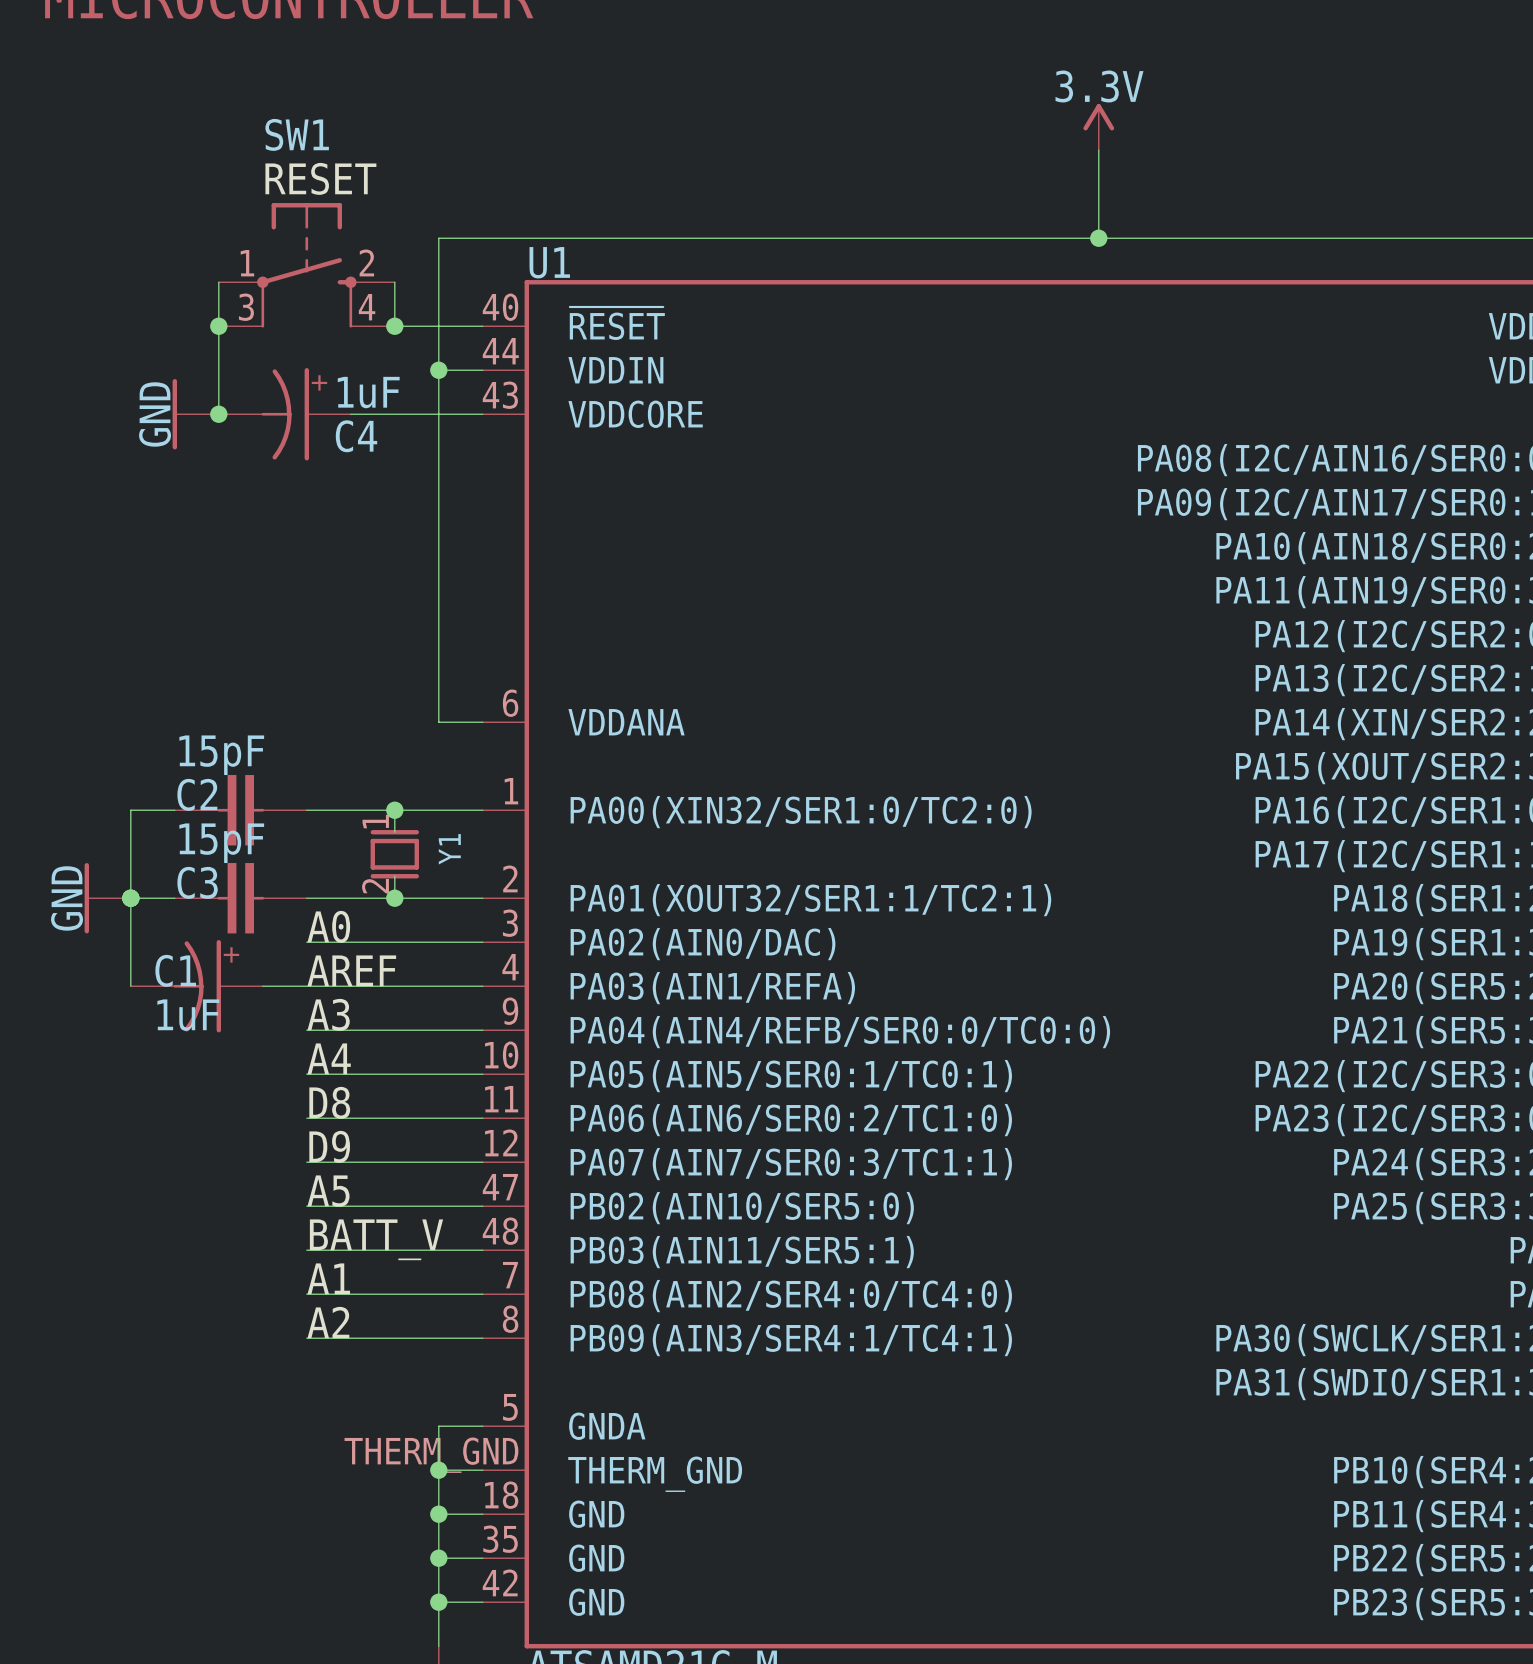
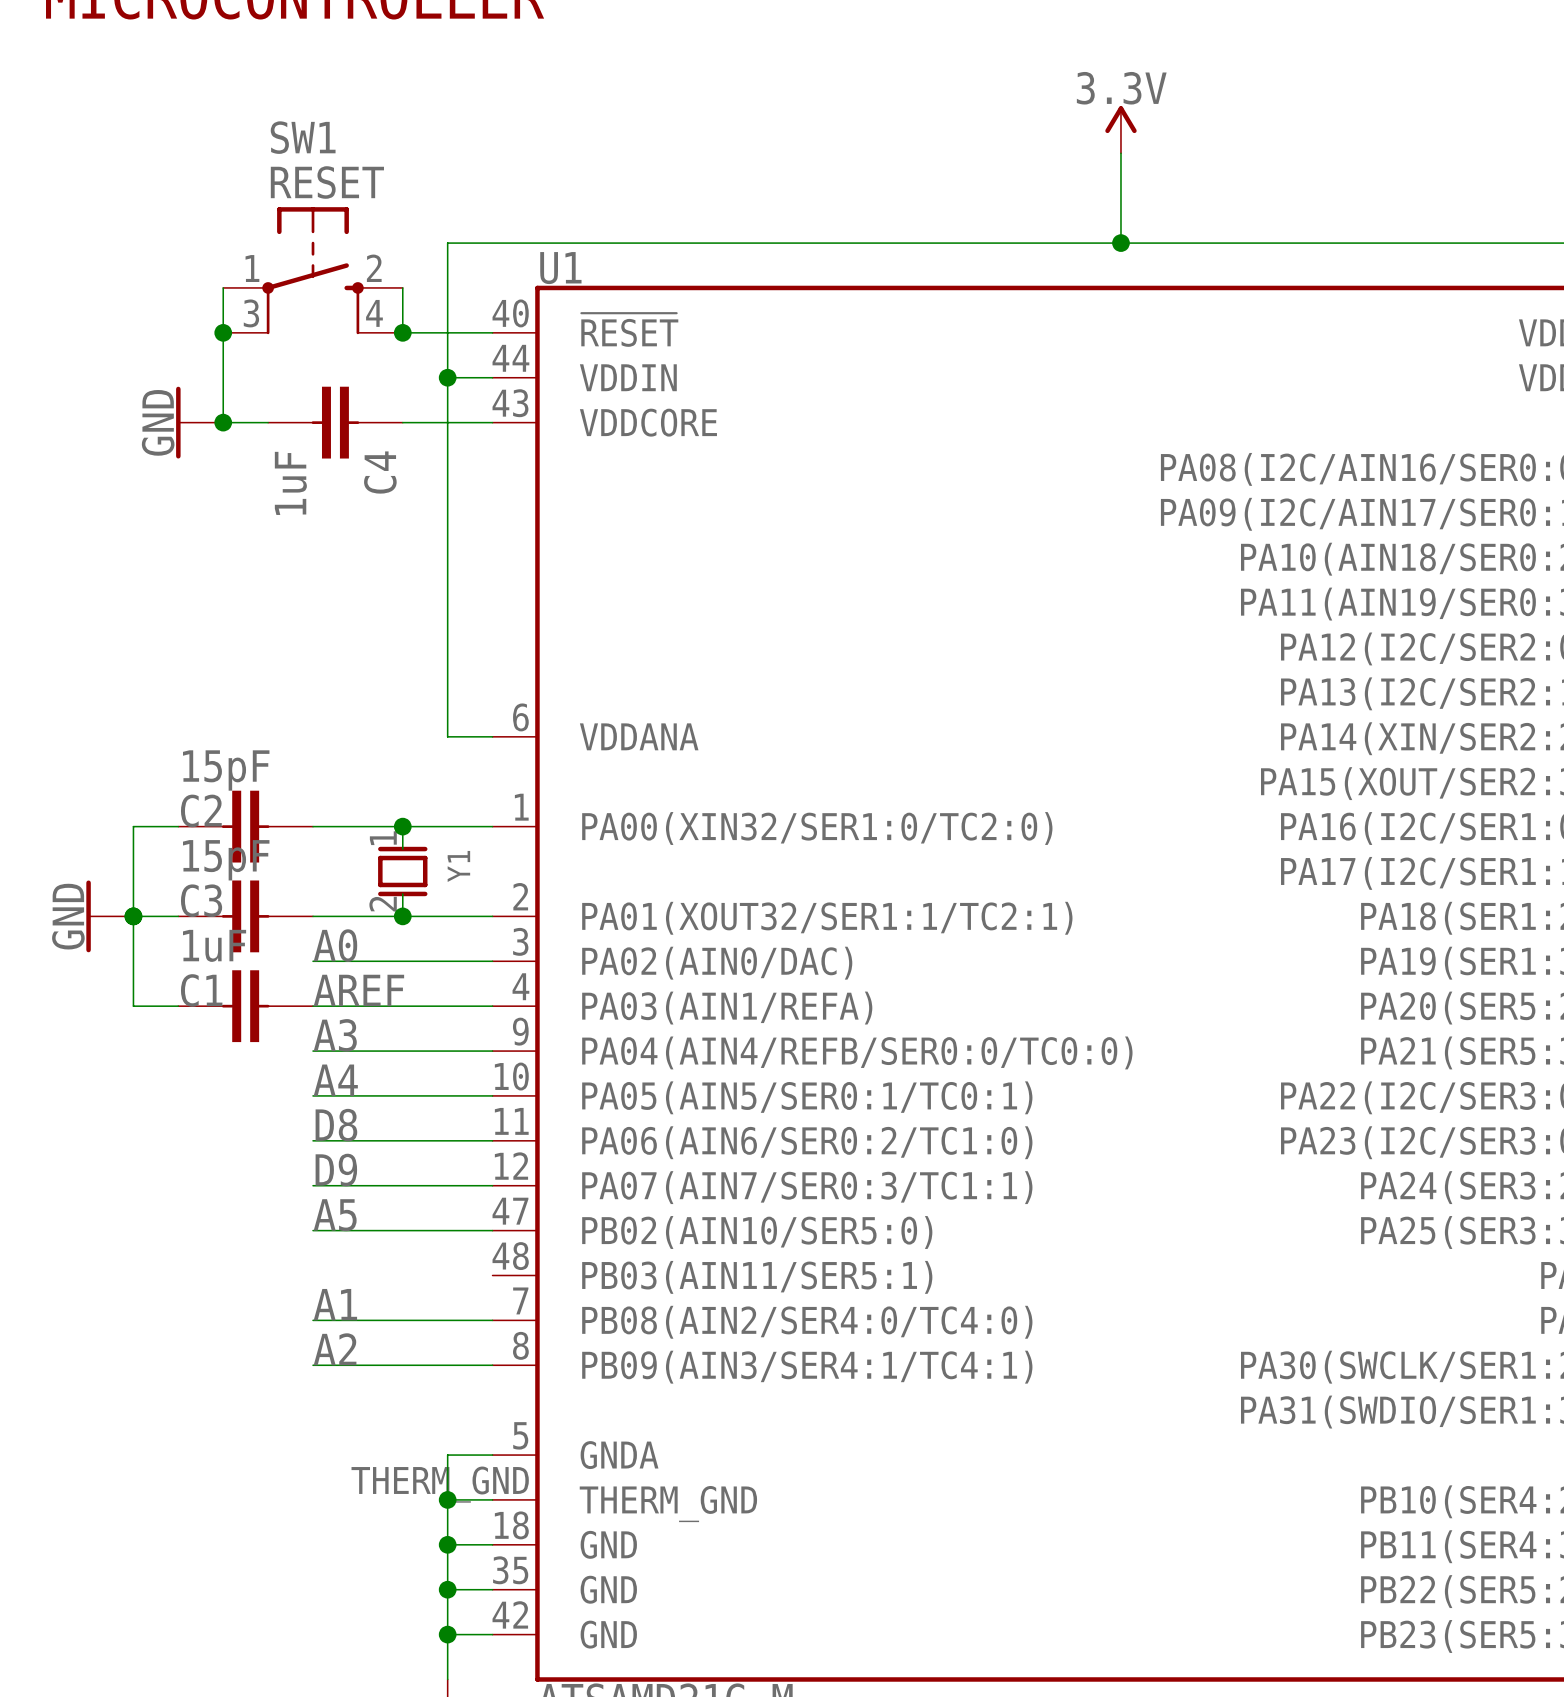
C4 symbol: [218, 368, 351, 461] -> [268, 386, 403, 459]
C4 value position: 1uF (368, 392) -> 1uF (290, 483)
C4 name position: C4 (356, 436) -> C4 (380, 472)
C1 symbol: [130, 940, 263, 1033] -> [178, 970, 314, 1043]
C1 value position: 1uF (188, 1015) -> 1uF (214, 945)
label: BATT_V (376, 1239) -> none
wire: (306, 1250) (482, 1250) -> none

